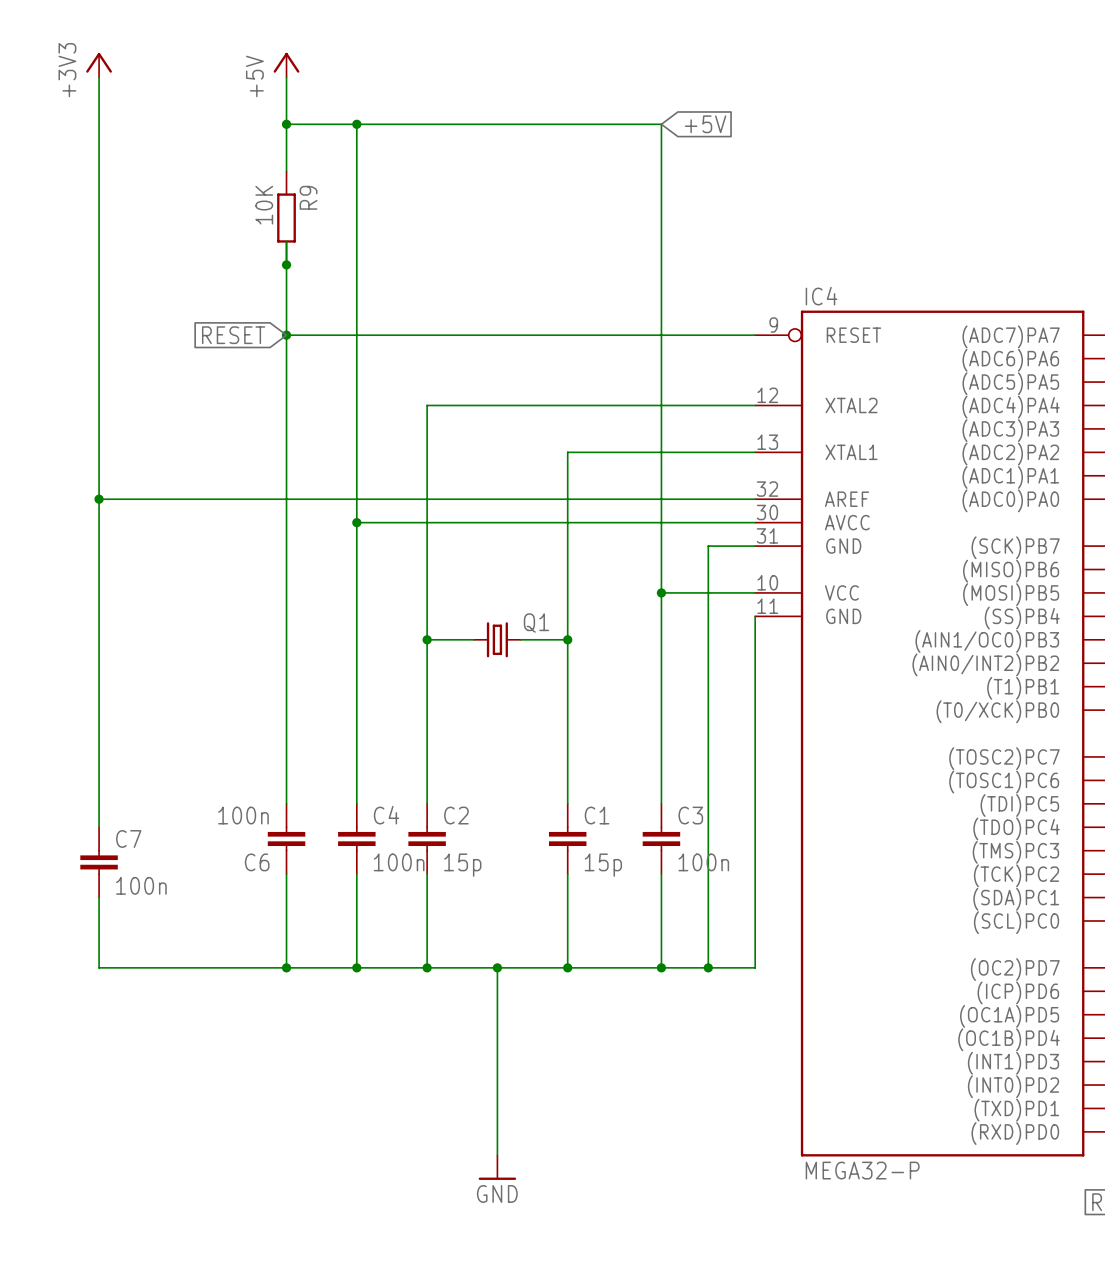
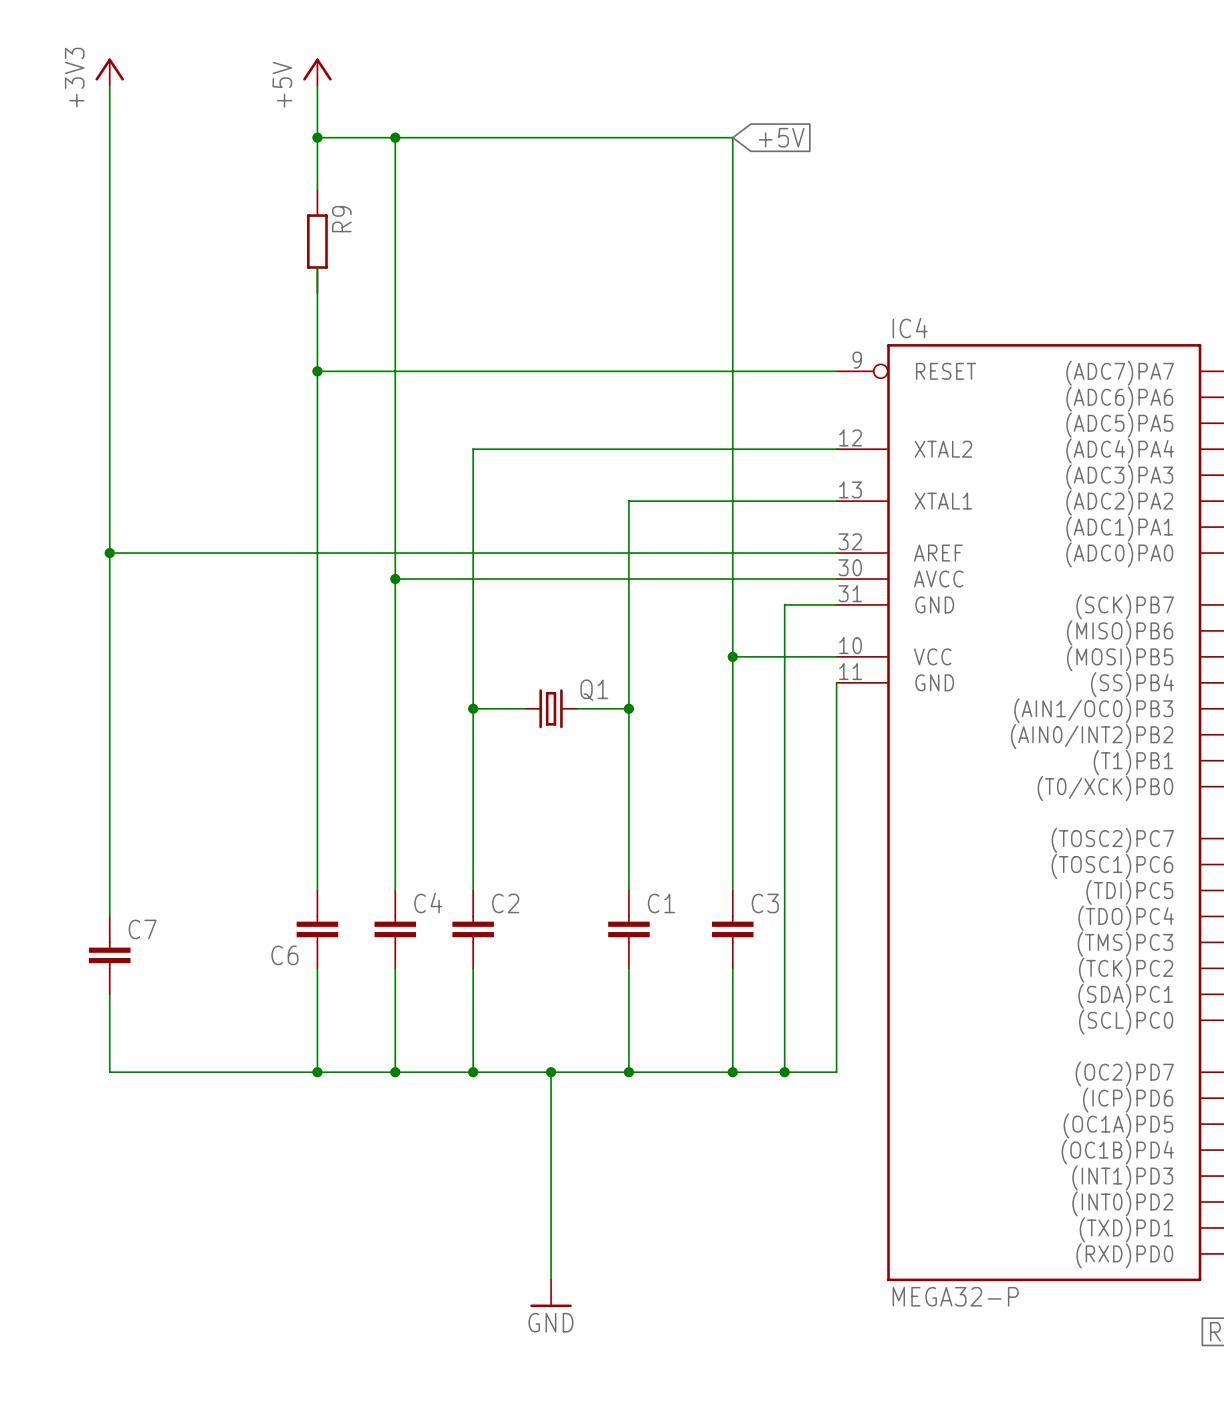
R9 value: 10K (264, 205) -> none
junction: (286, 264) -> none
global label: RESET (233, 335) -> none
C6 value: 100n (243, 815) -> none
C4 value: 100n (399, 862) -> none
C3 value: 100n (703, 862) -> none
C2 value: 15p (462, 865) -> none
C1 value: 15p (603, 865) -> none
C7 value: 100n (141, 885) -> none

